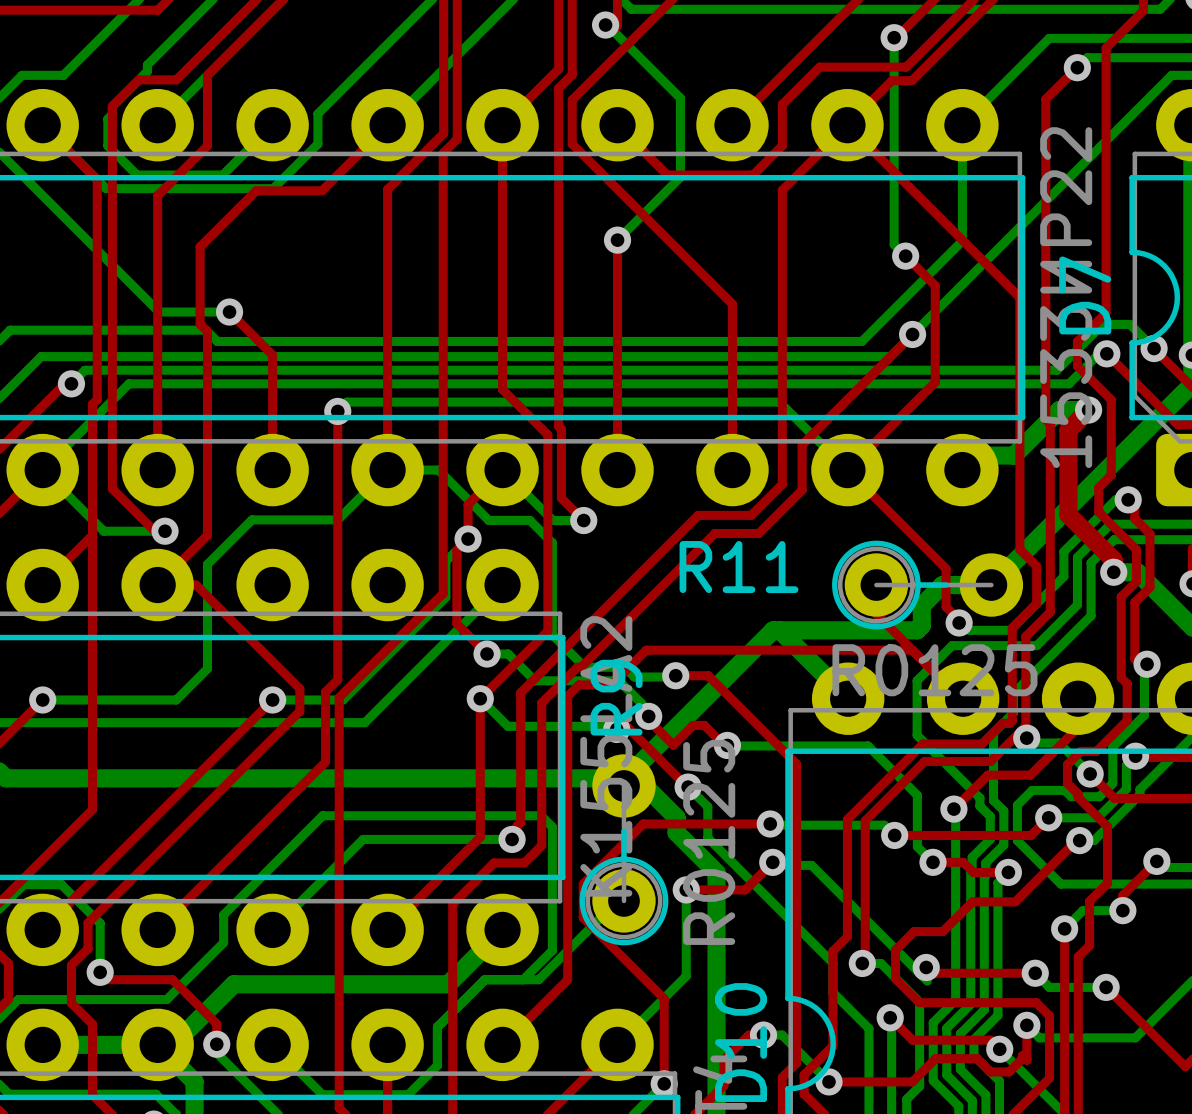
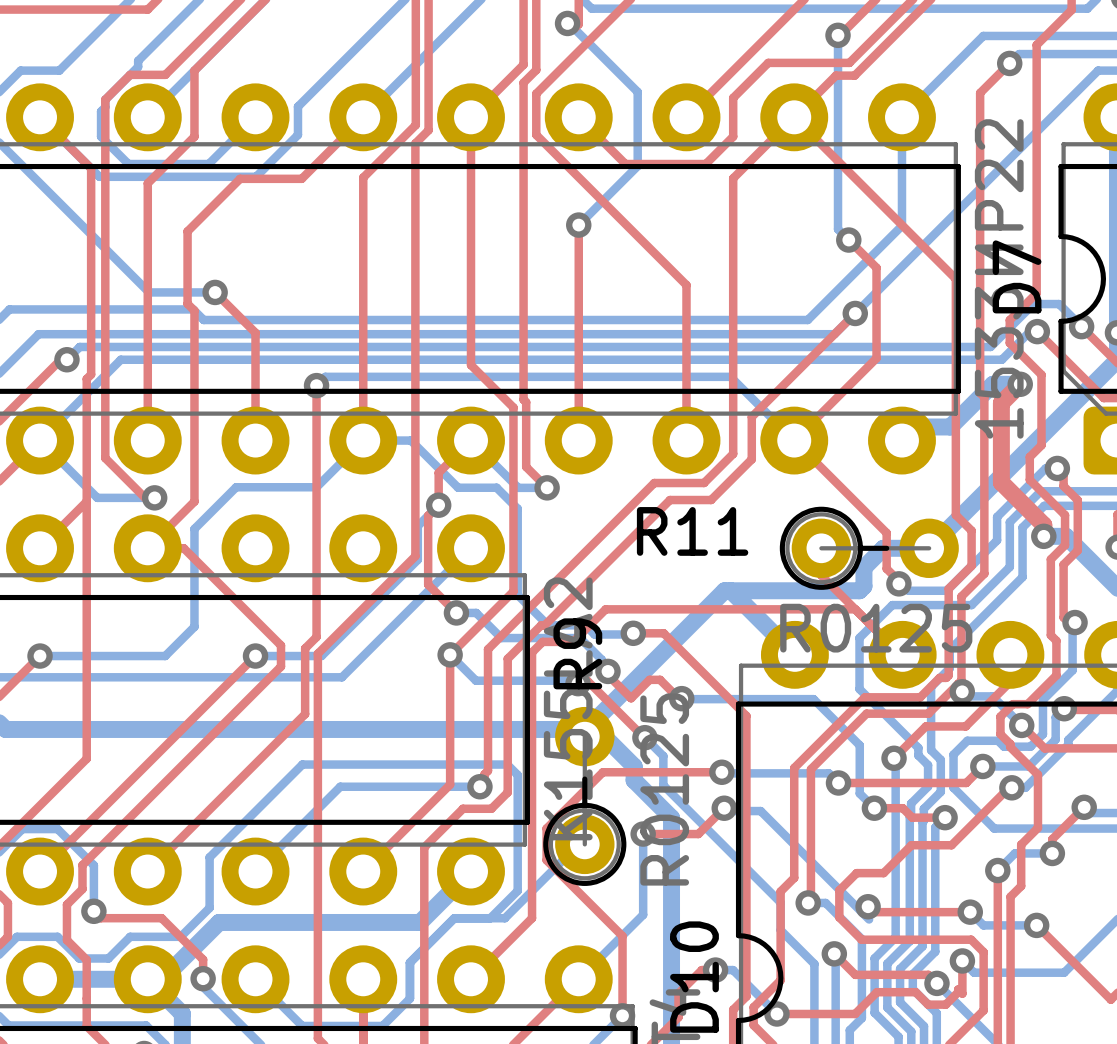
bottom track: (223, 942) (166, 999) -> (209, 883) (209, 907) (180, 936) (156, 936)
bottom track: (61, 999) (138, 999) -> (57, 936) (79, 958) (108, 958) (130, 936)

